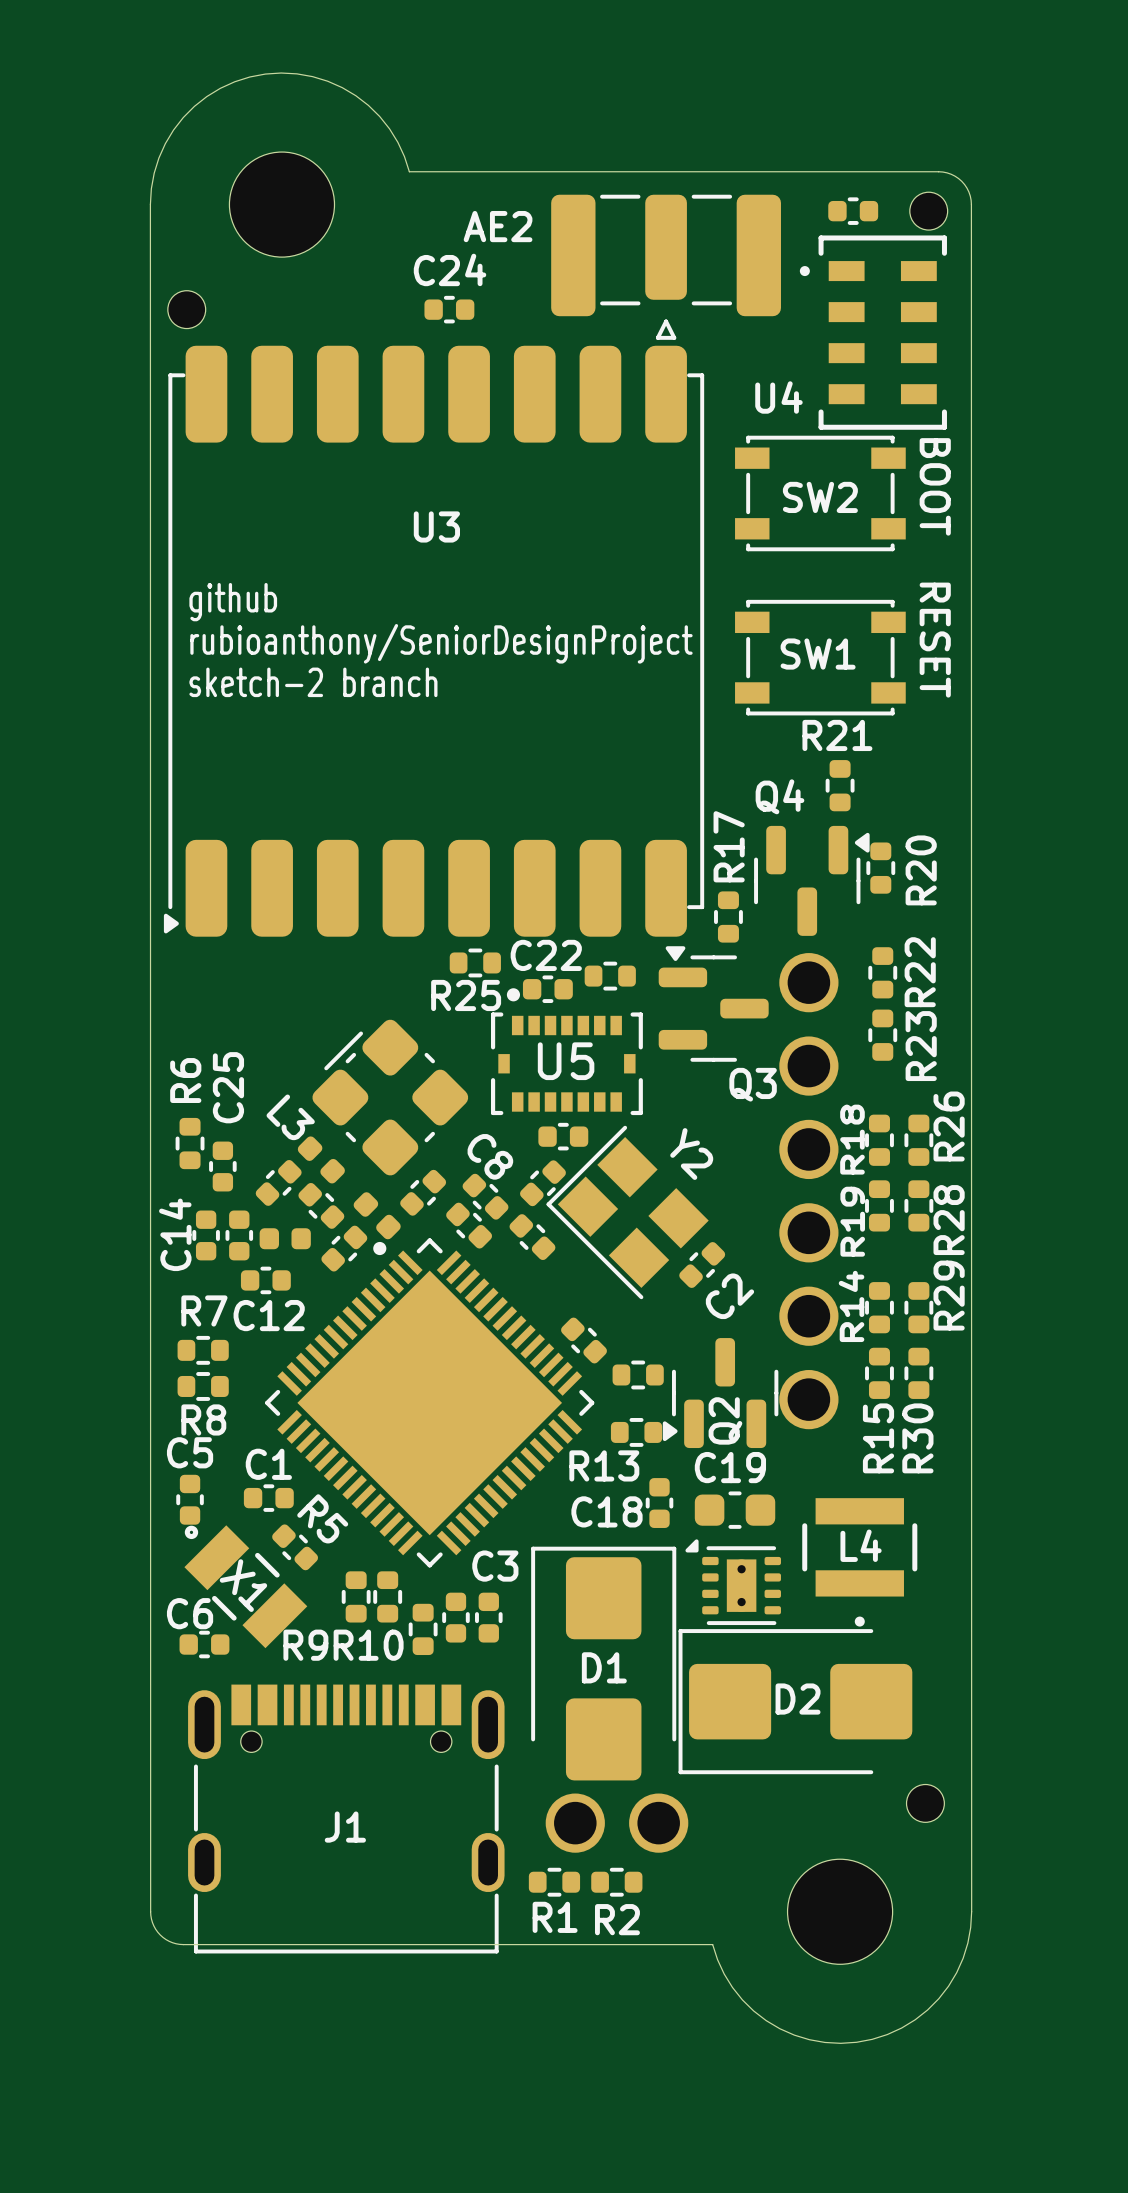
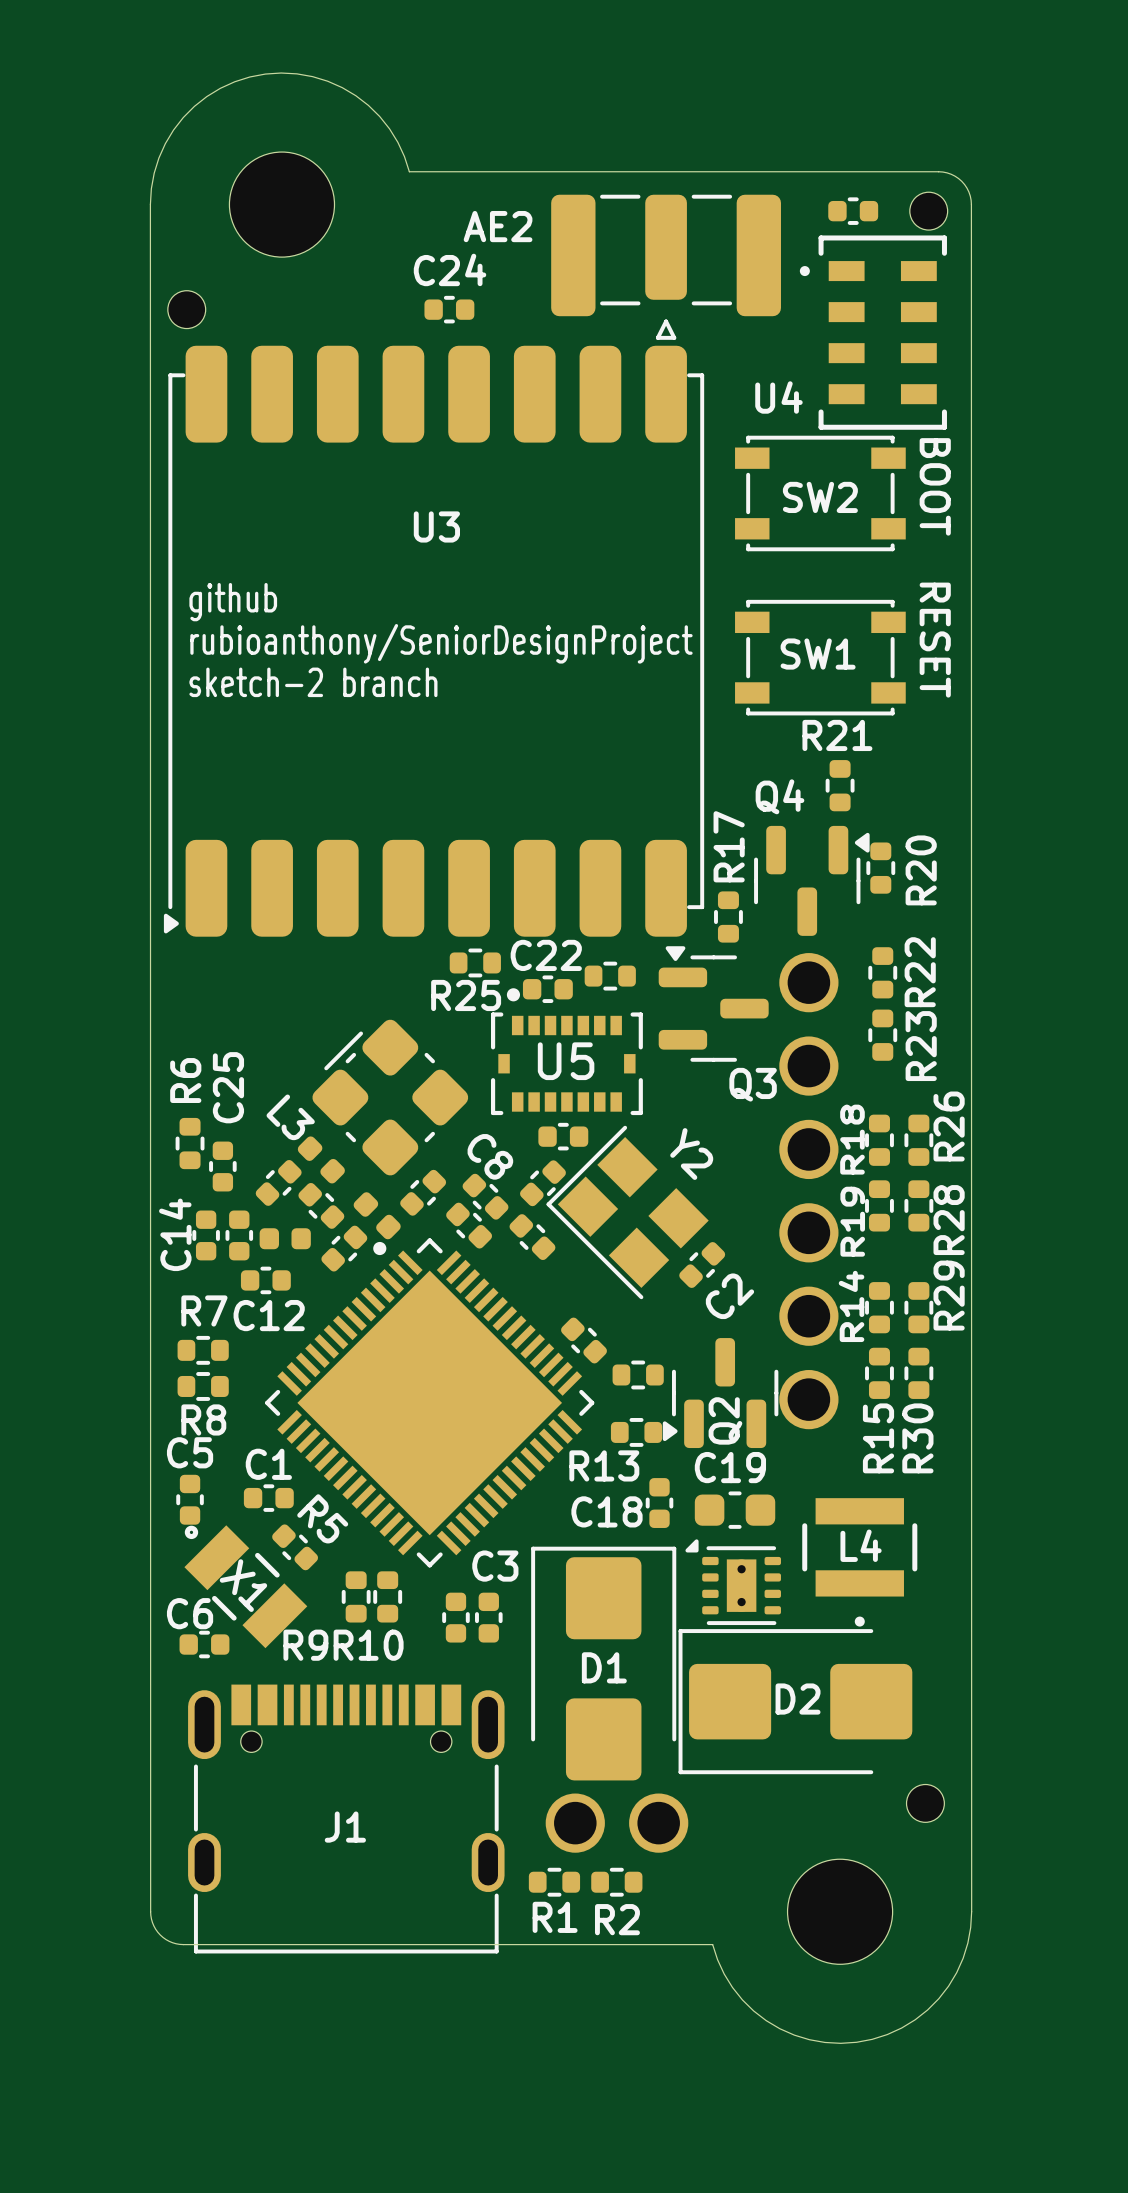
part: (423, 1629) -> none

